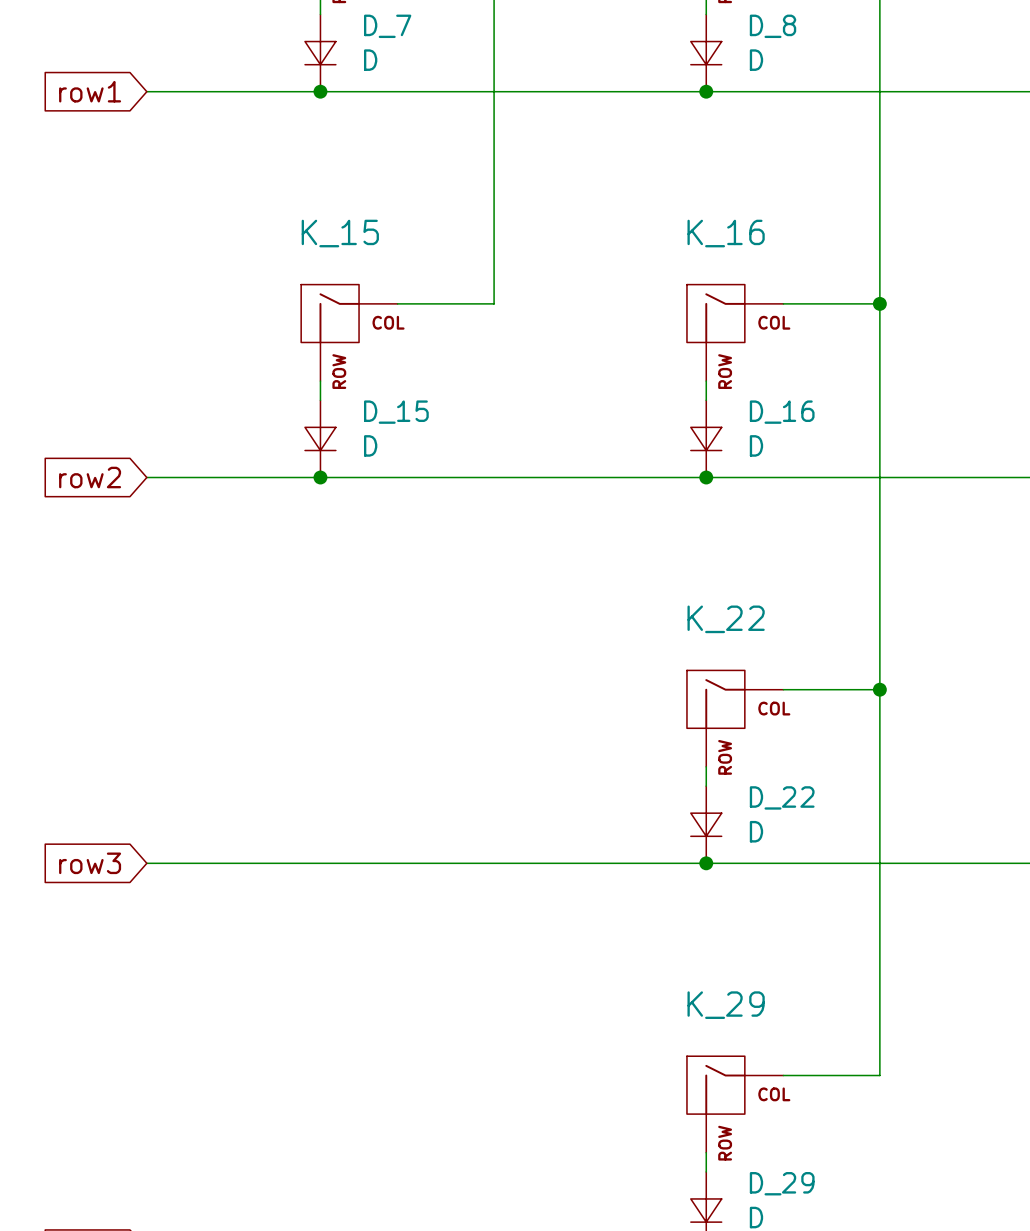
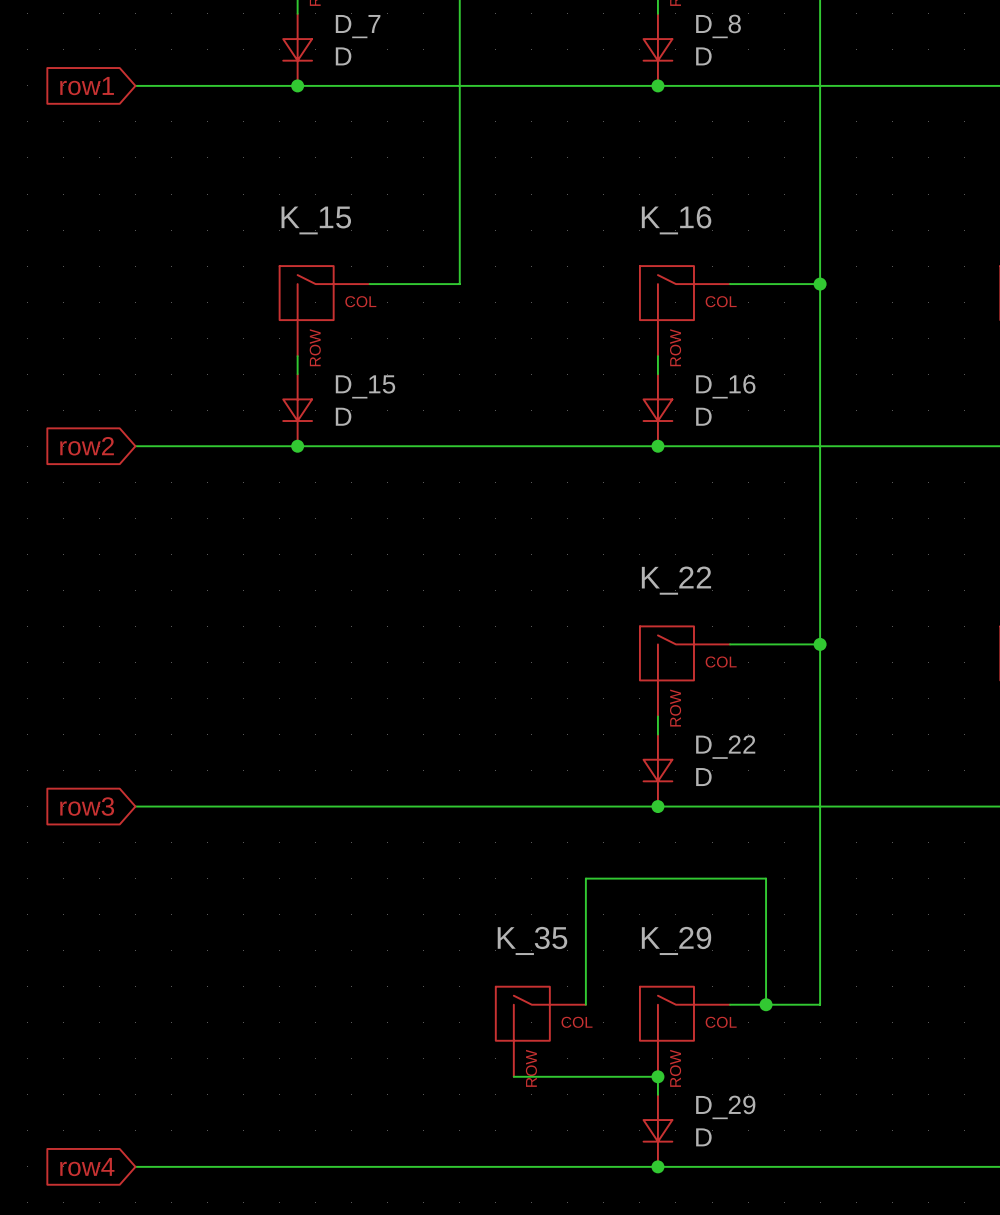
wire: none -> (585, 1004) (585, 878) (766, 878) (766, 1004)
junction: none -> (766, 1004)
K_35: none -> (540, 1031)
wire: none -> (513, 1076) (657, 1076)
junction: none -> (657, 1076)

